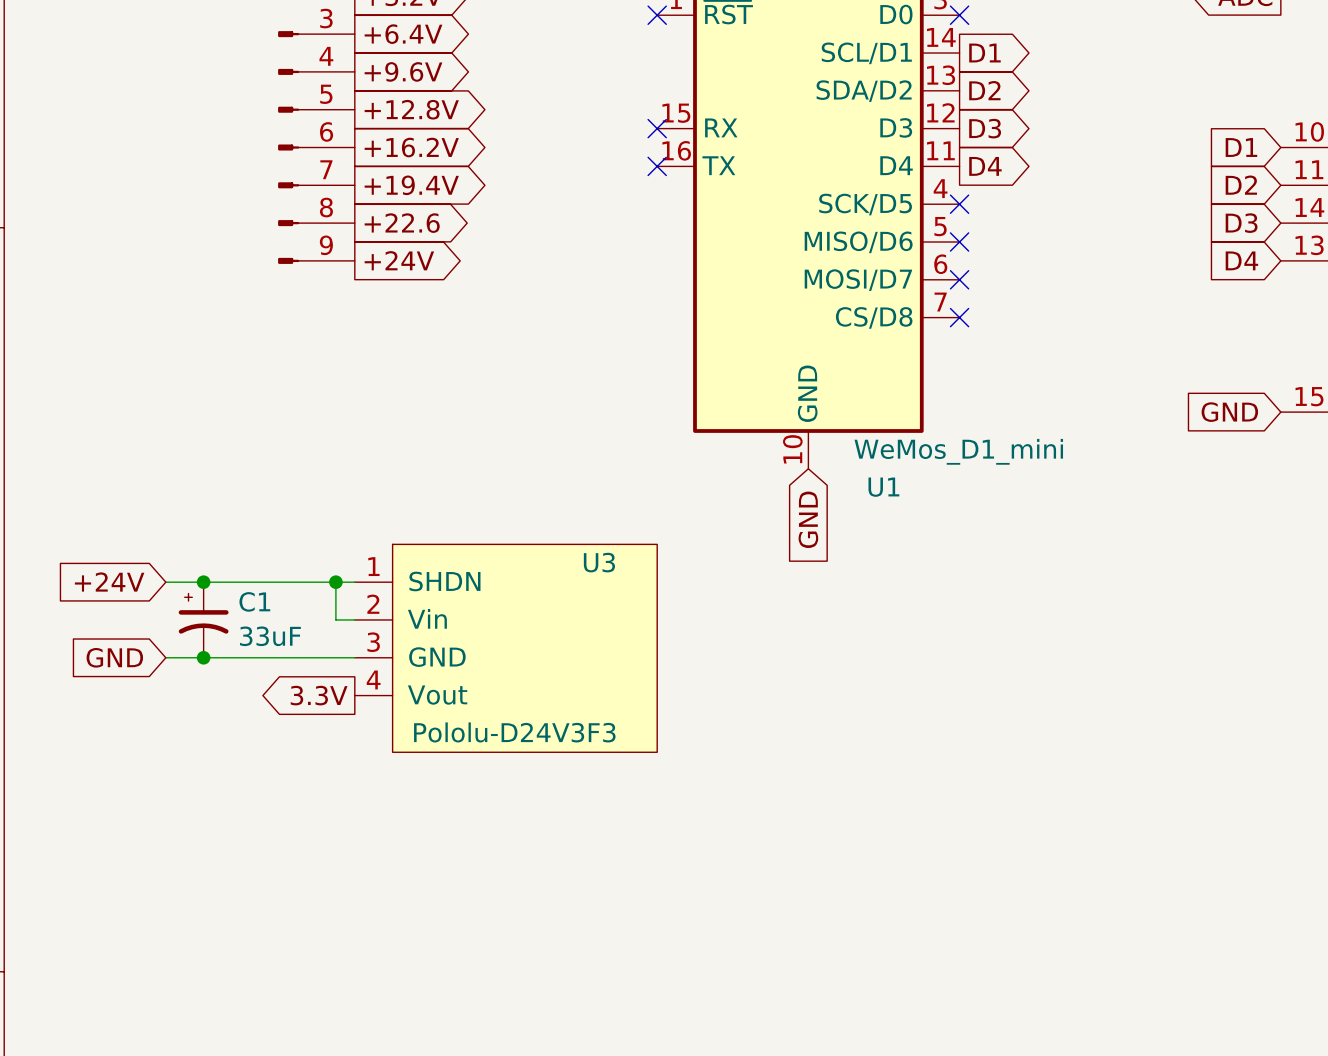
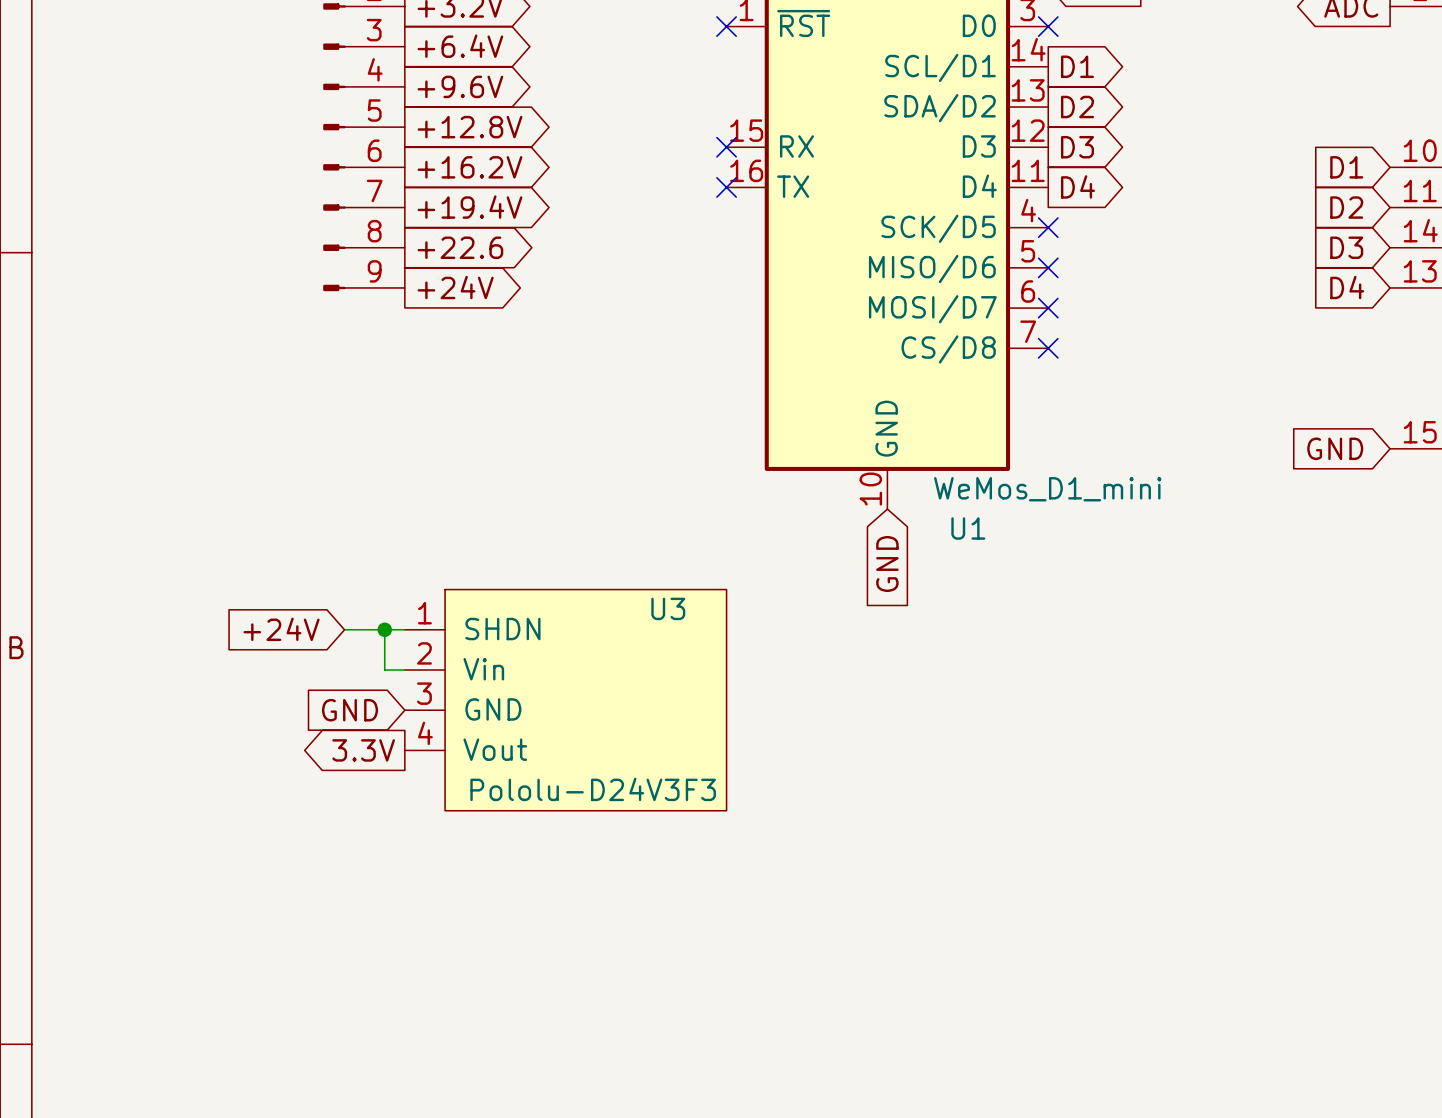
global label position: +24V (109, 582) -> +24V (281, 629)
wire: (165, 582) (298, 582) -> none
junction: (203, 582) -> none
C1: 33uF (203, 619) -> none
global label position: GND (114, 657) -> GND (349, 710)
wire: (165, 657) (354, 657) -> none
junction: (203, 657) -> none

